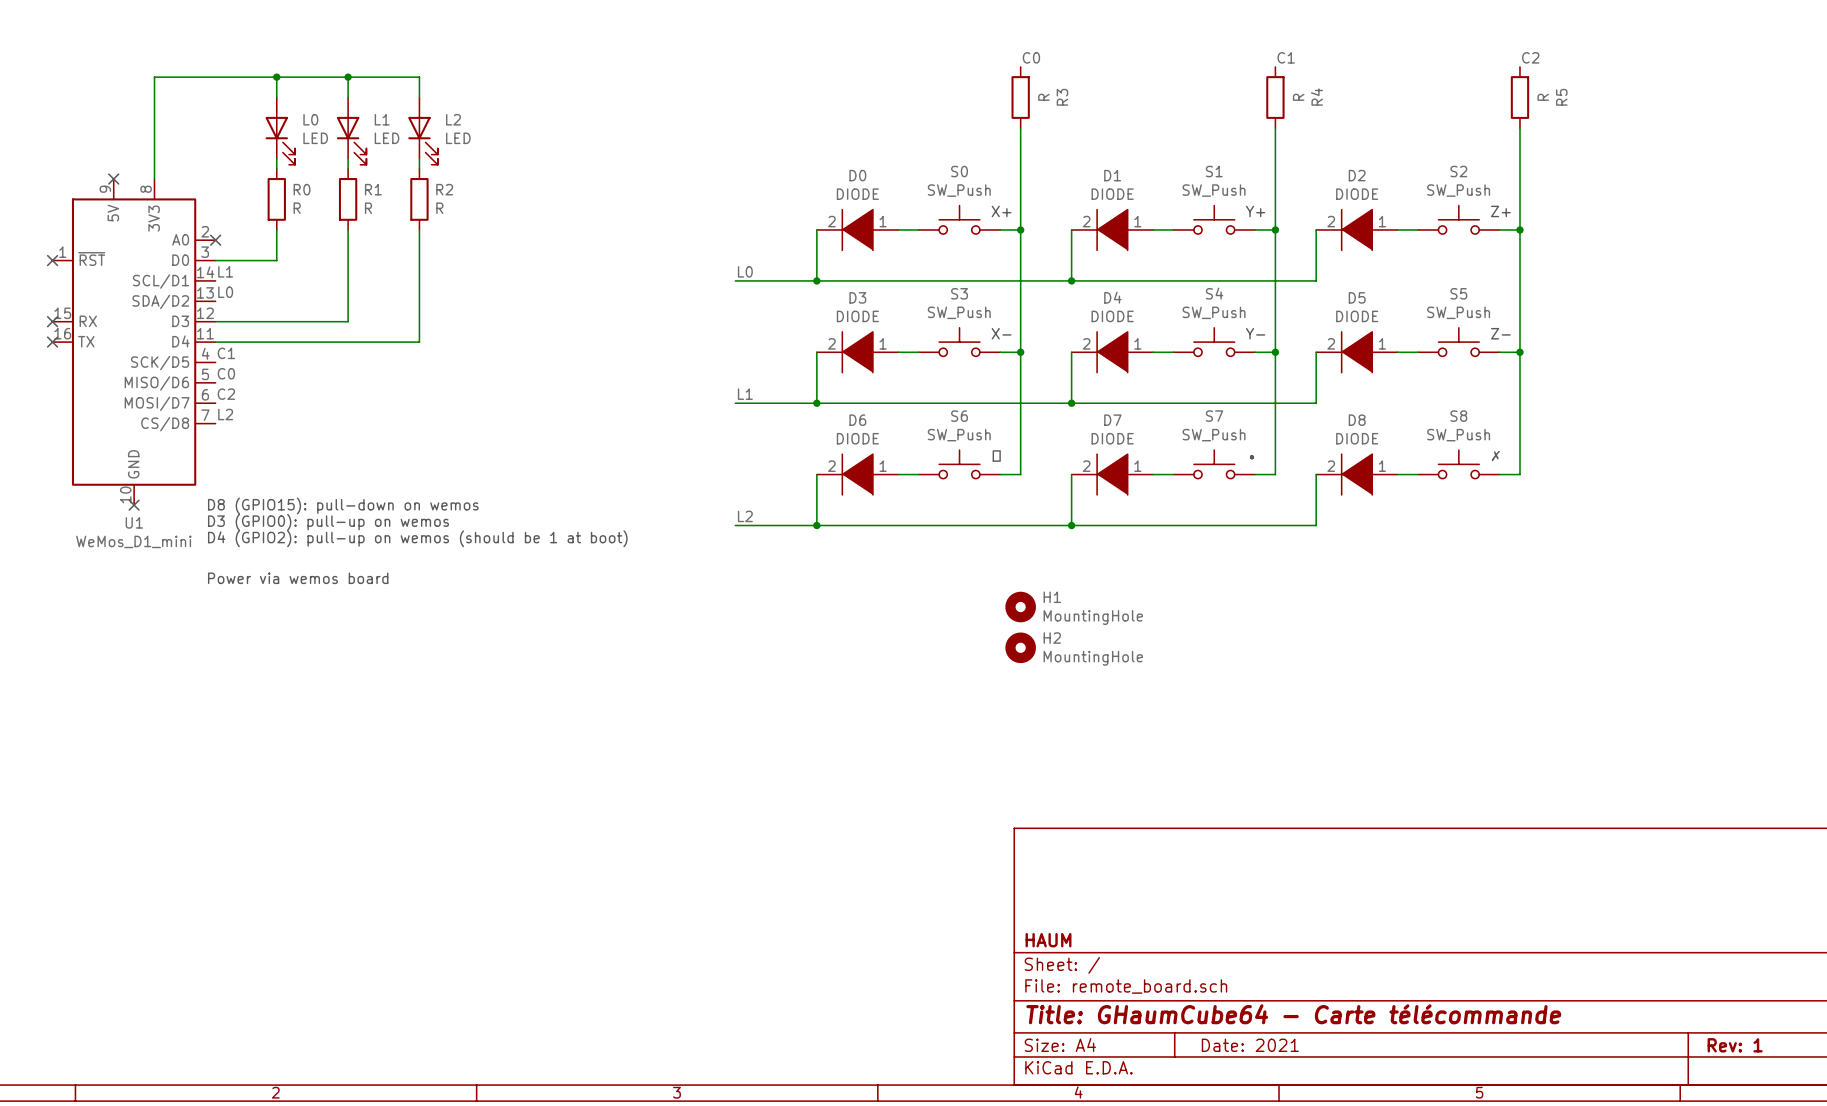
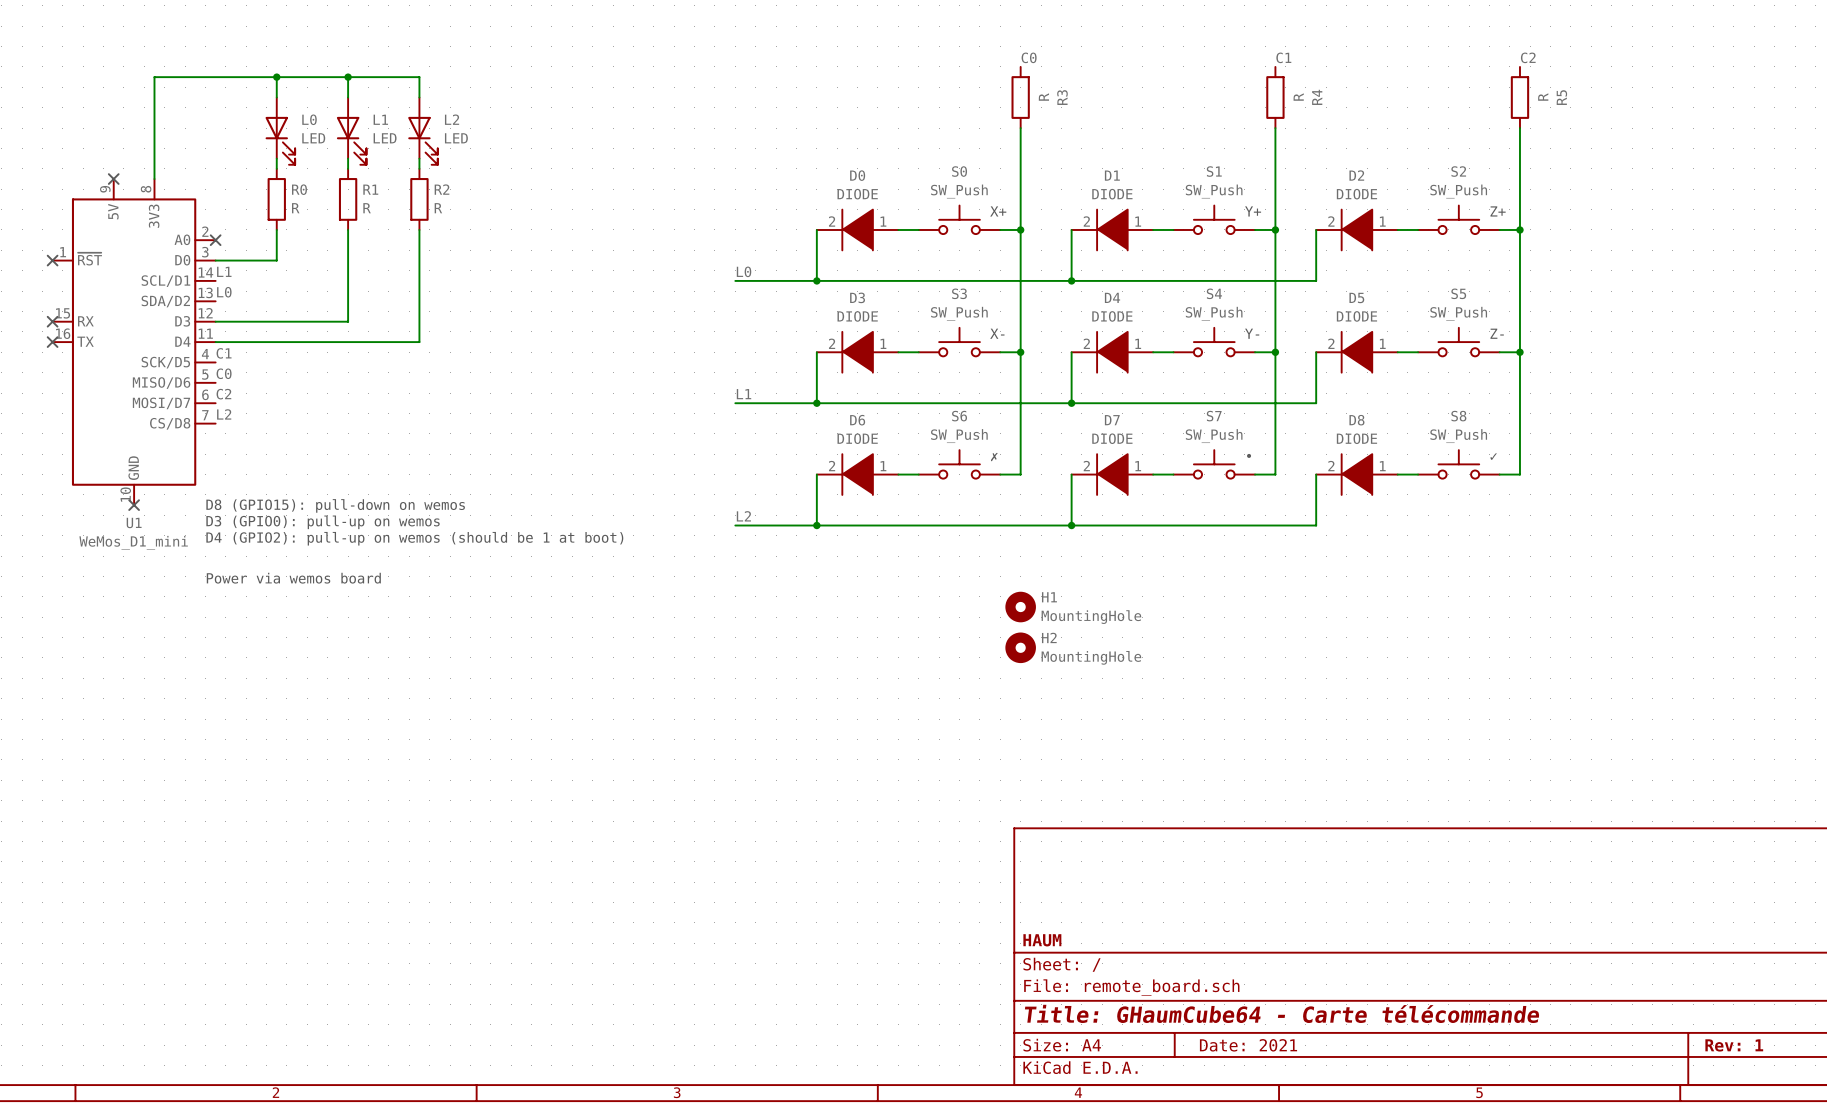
text: ✓ (996, 456) -> ✗ (994, 457)
text: ✗ (1495, 456) -> ✓ (1493, 456)

